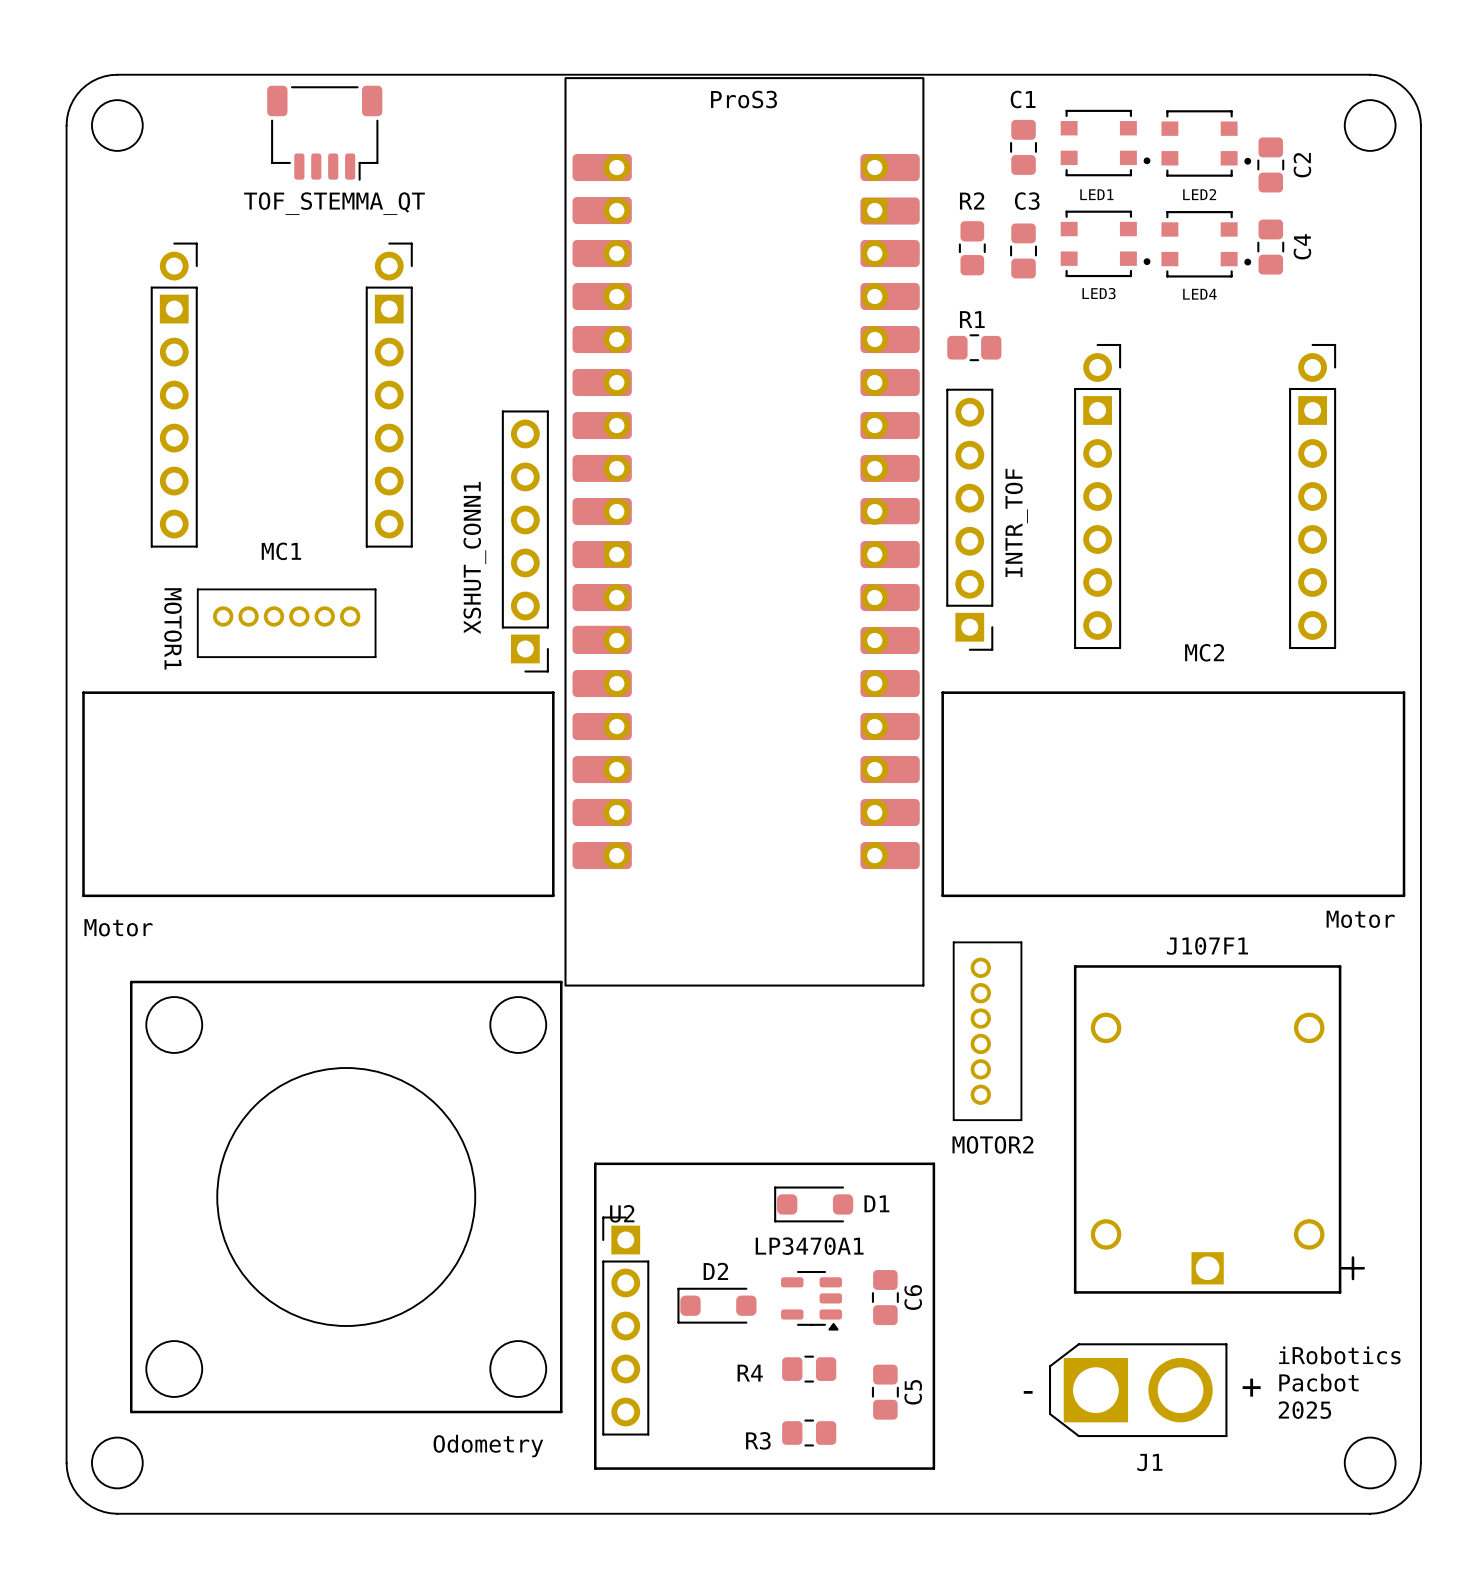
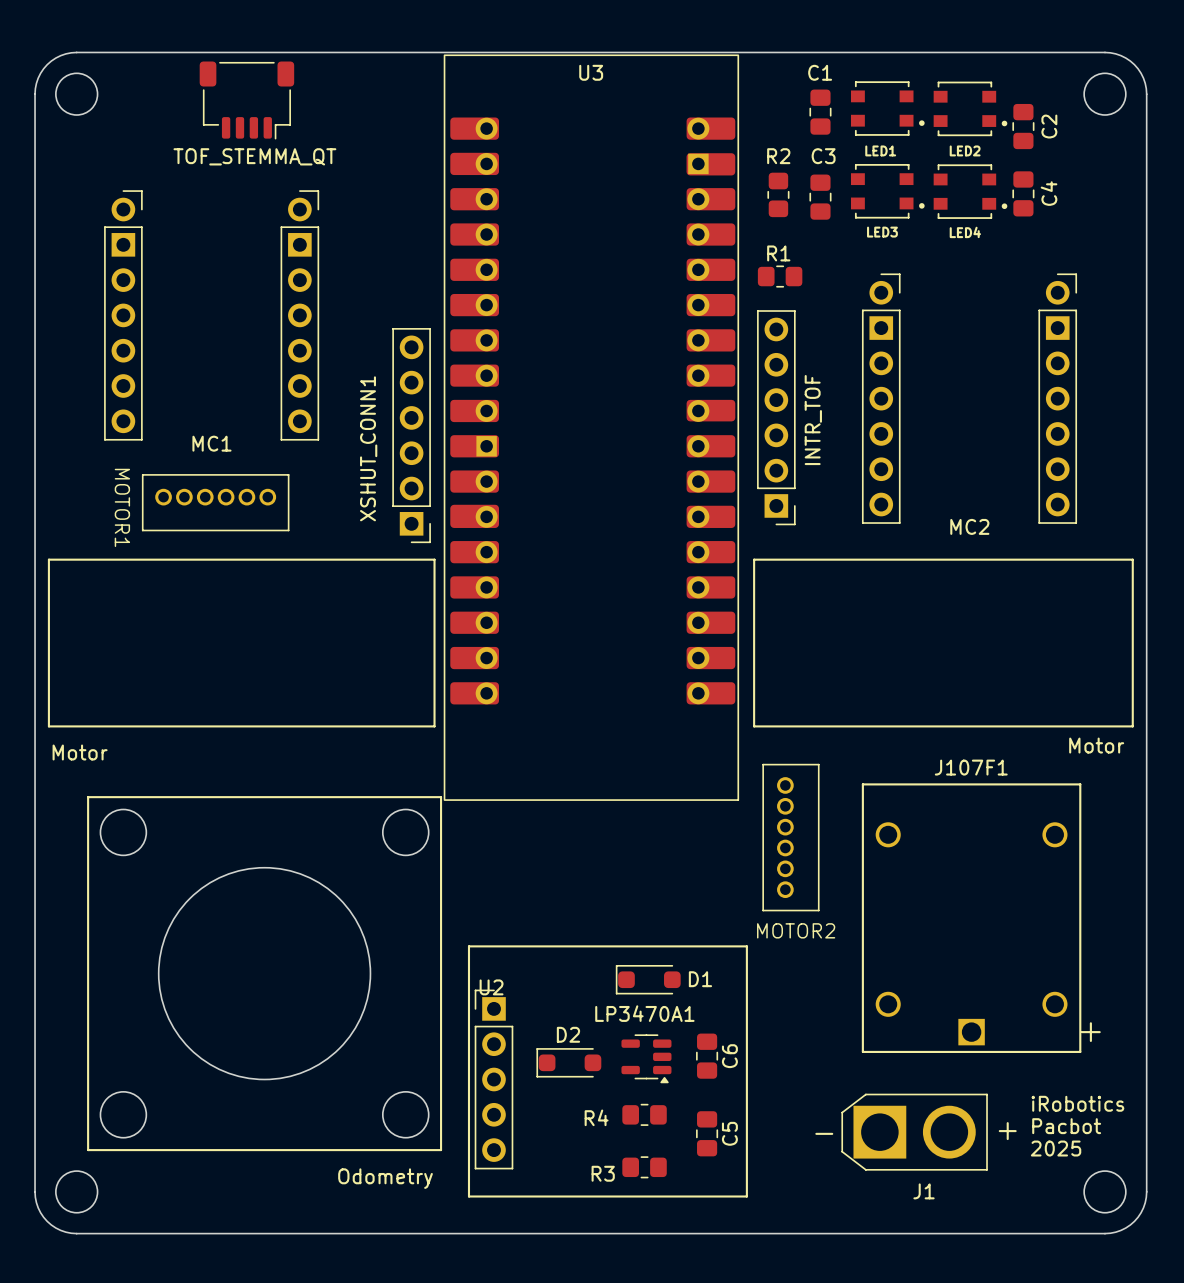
ProS3 name: ProS3 (744, 99) -> U3 (591, 72)

